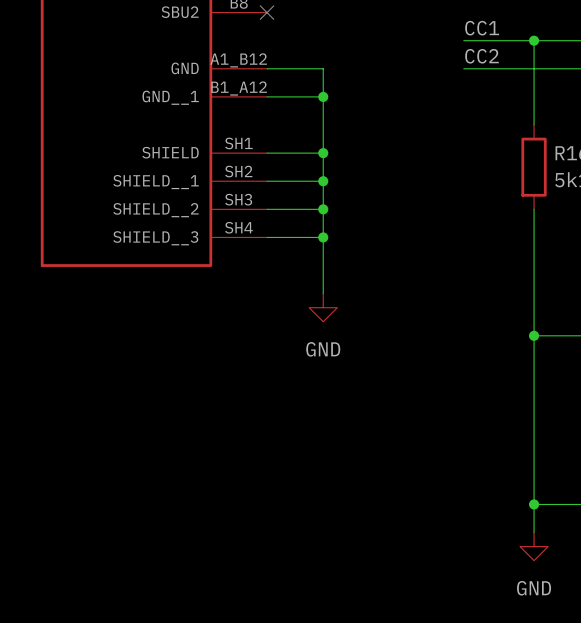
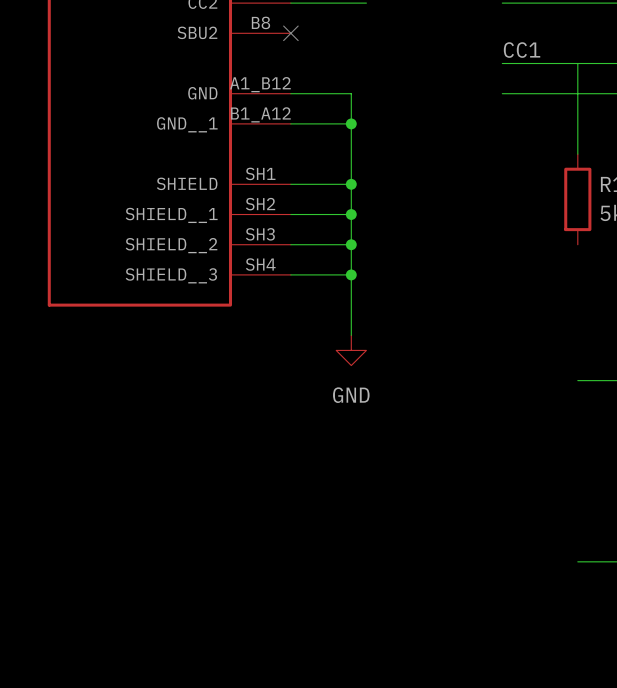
junction: (534, 40) -> none
label: CC2 (481, 56) -> none
wire: (534, 209) (534, 532) -> none
junction: (534, 335) -> none
junction: (534, 504) -> none
power symbol: GND (534, 546) -> none

